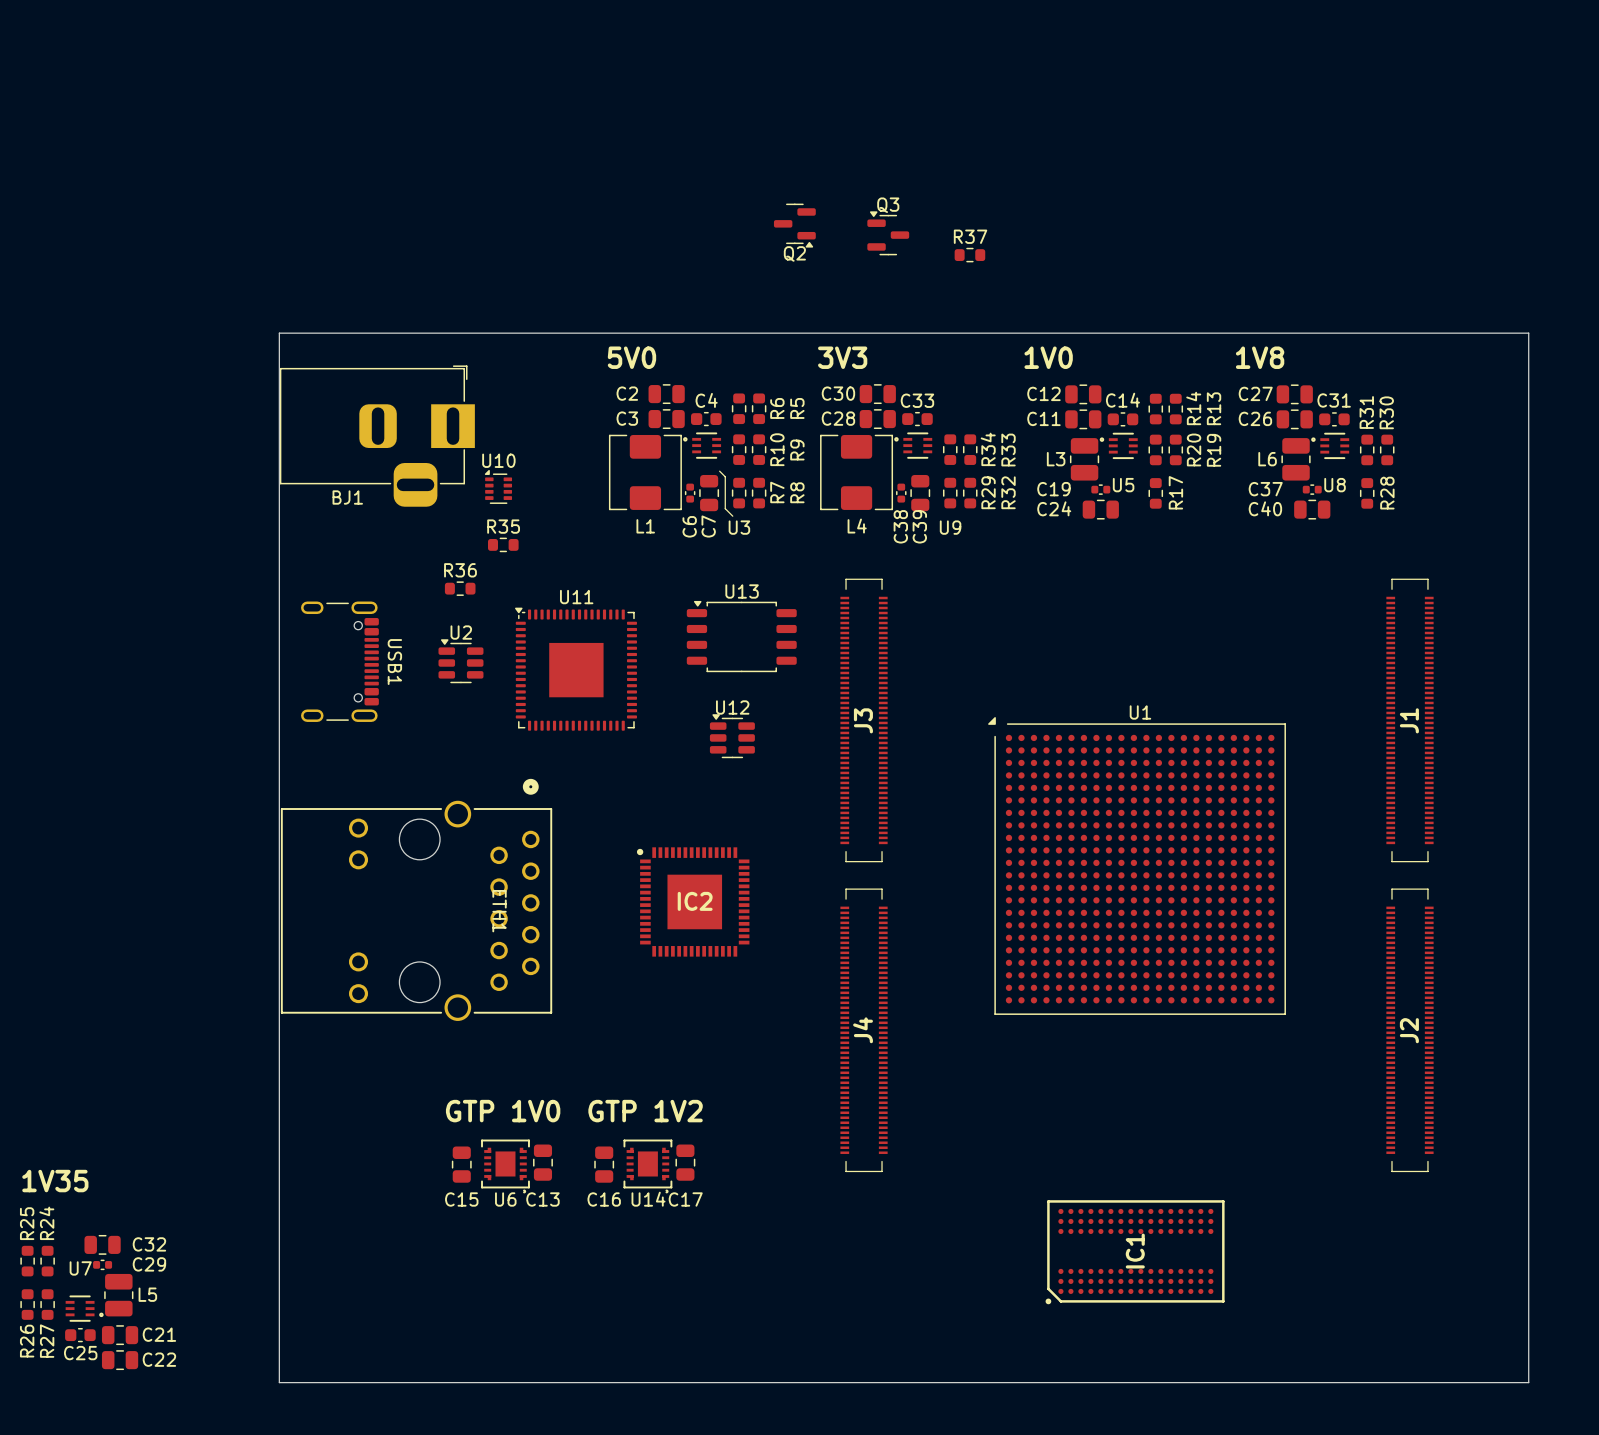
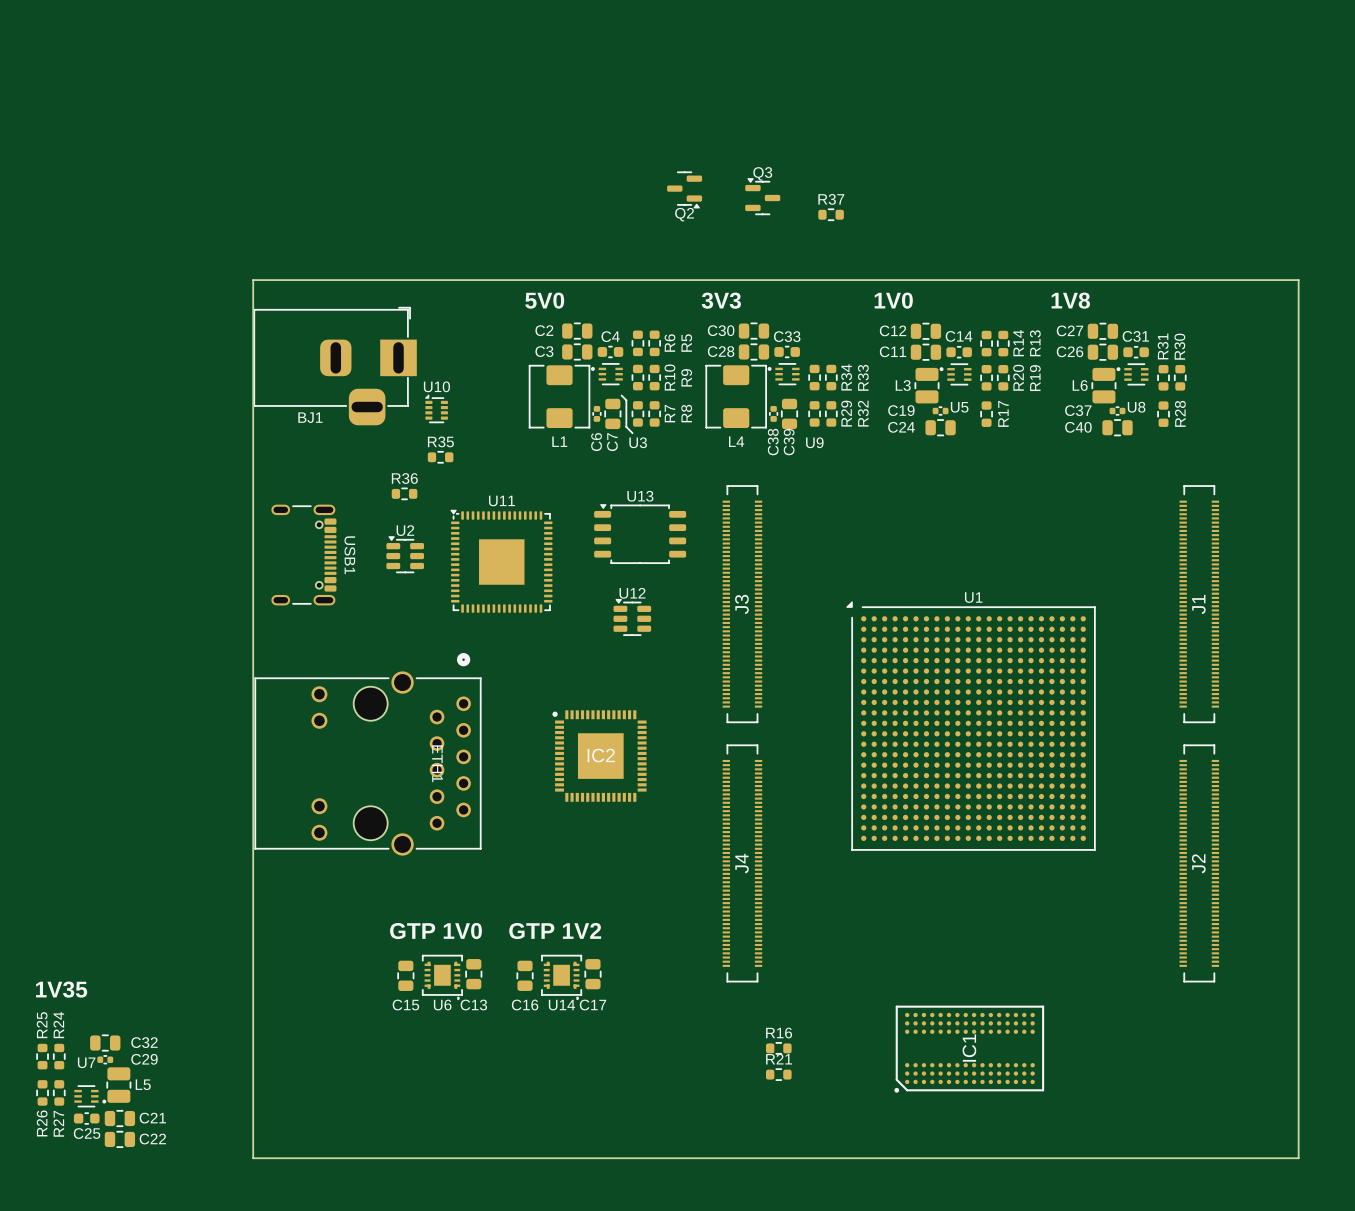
R16: none -> (778, 1048)
R21: none -> (778, 1074)

